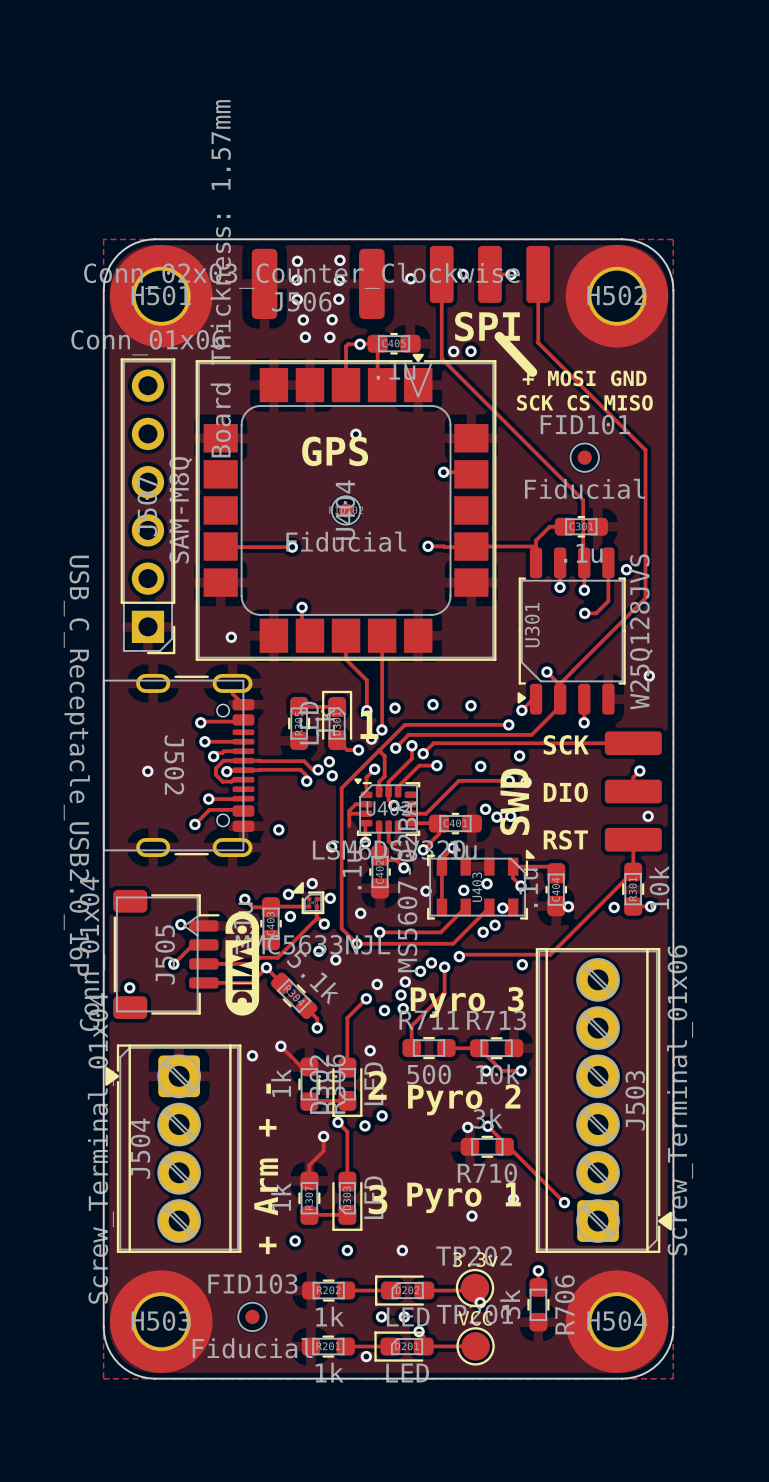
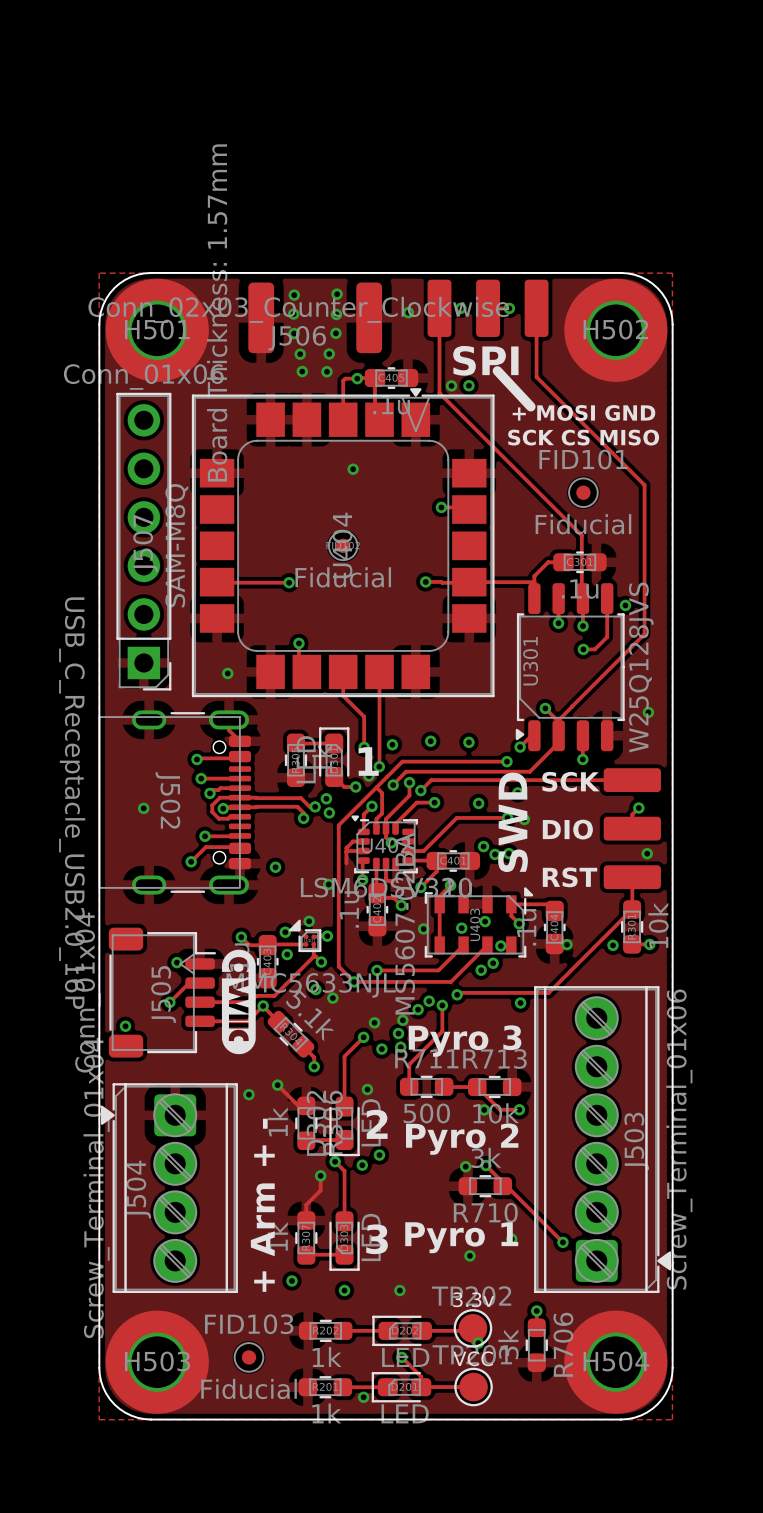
text: GPS (335, 451) -> none
via: (360, 913) -> none
via: (381, 1316) -> none
track: none -> (401, 1357) (421, 1376)
via: (419, 1331) -> none

